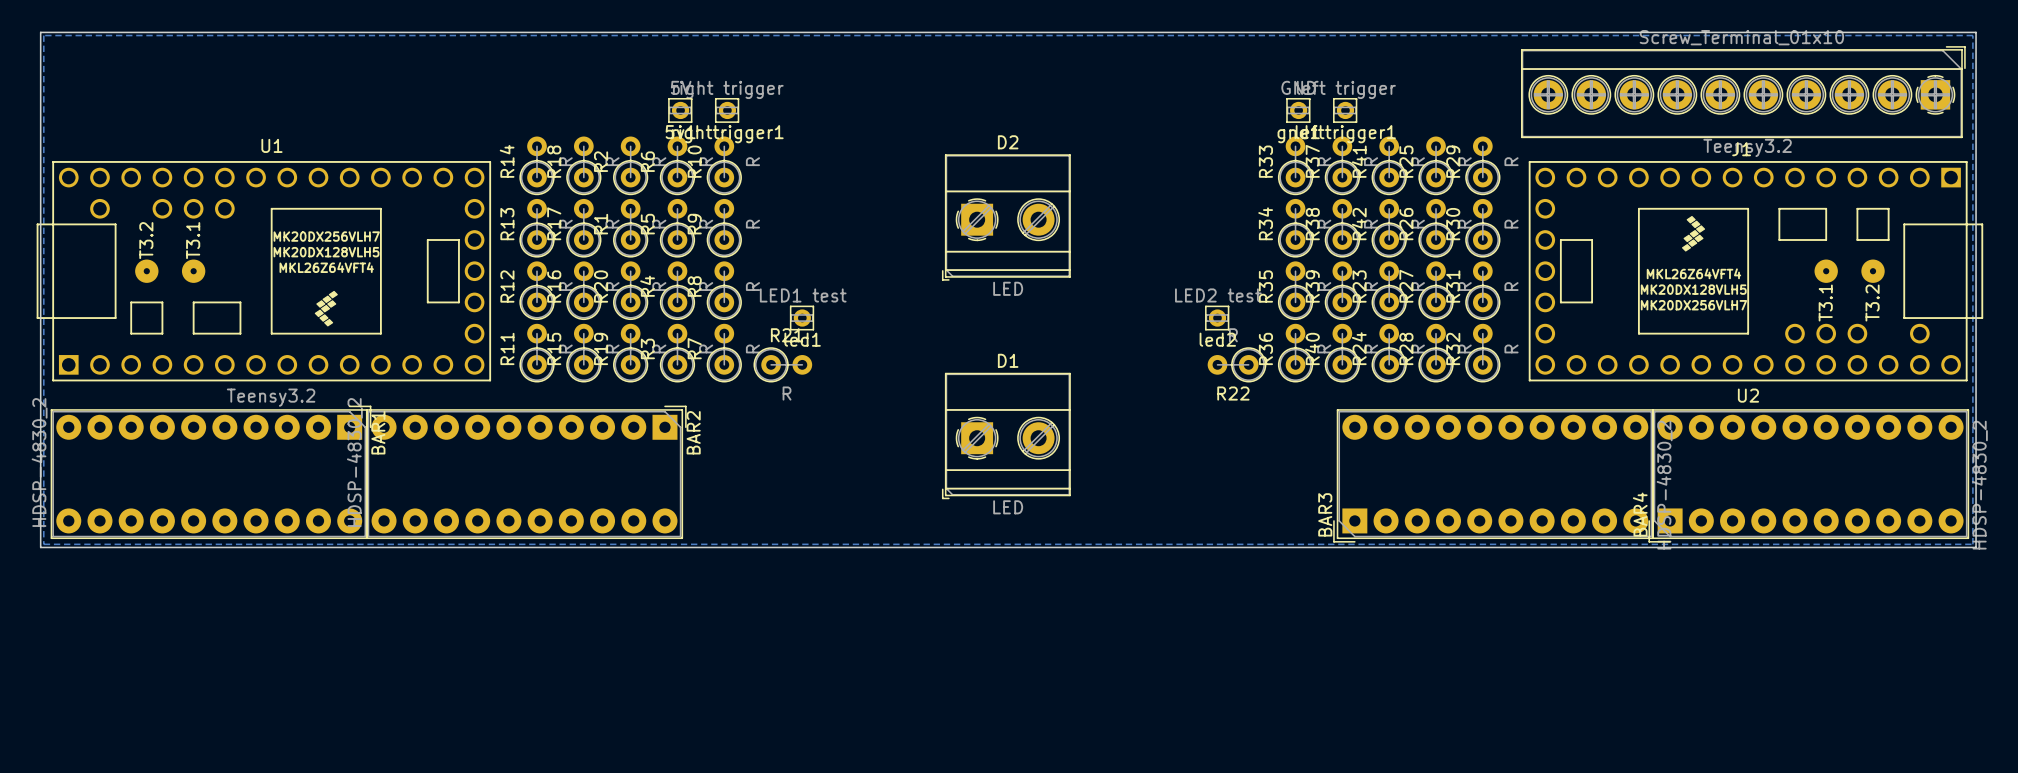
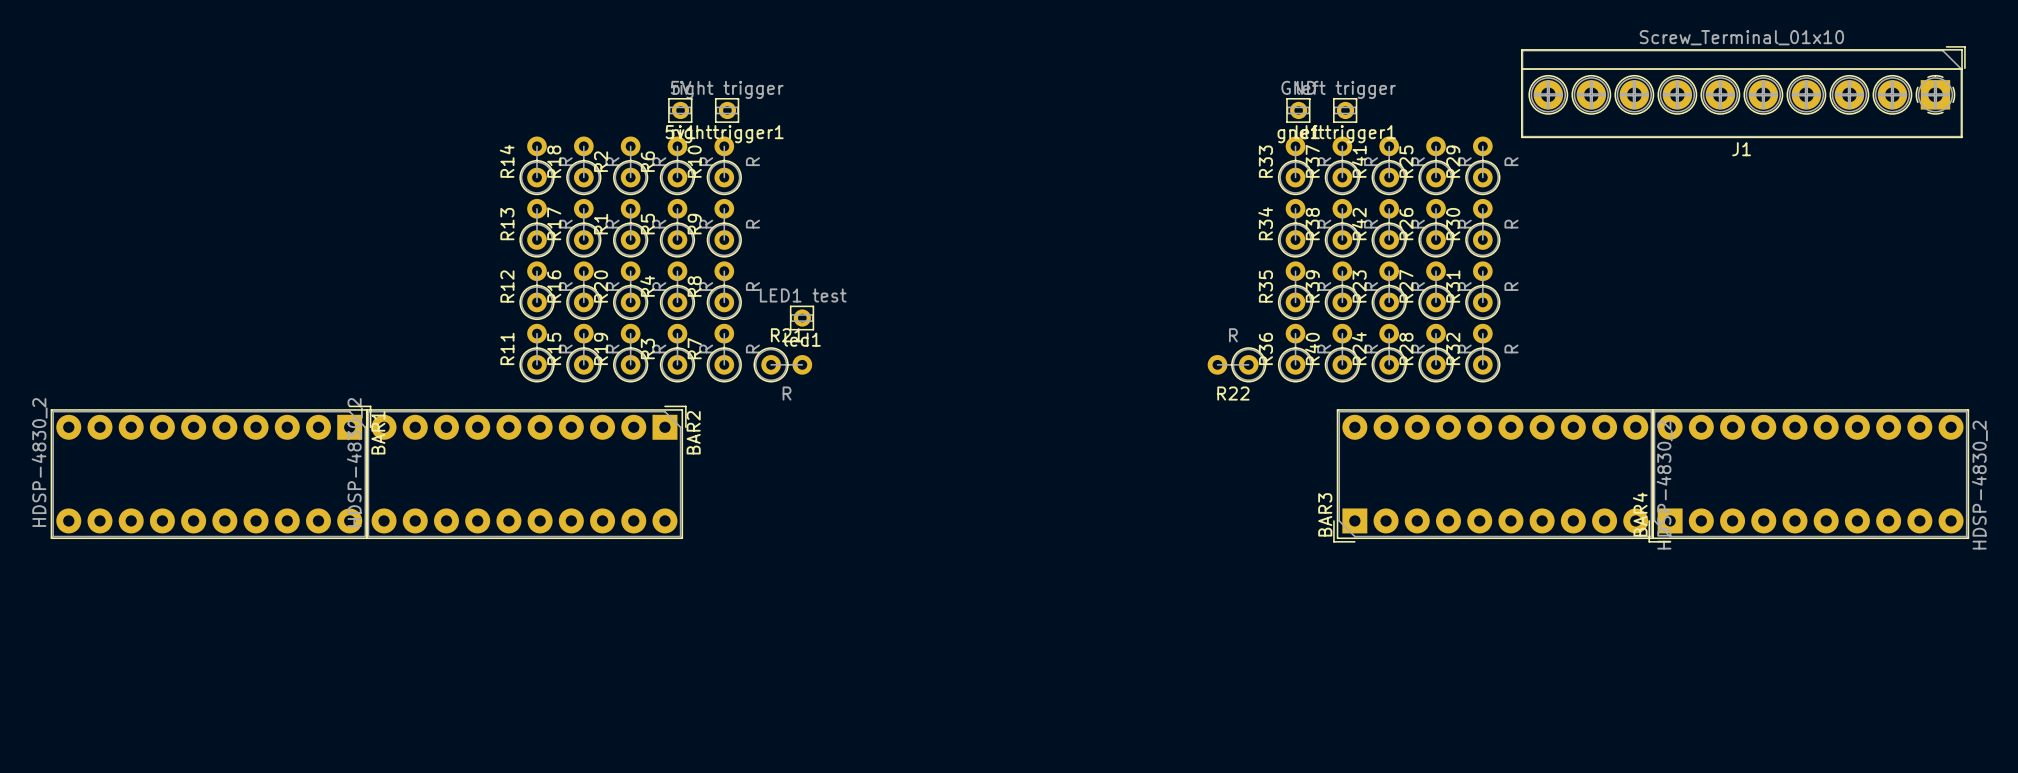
board edge: (40, 32) (40, 547) (1976, 547) (1976, 32) (40, 32) -> none
bottom zone outline: (43, 35) (43, 544) (1972, 544) (1972, 35) (43, 35) -> none
D2: LED (1006, 217) -> none
U1: Teensy3.2 (263, 271) -> none
U2: Teensy3.2 (1755, 271) -> none
led2: LED2 test (1217, 318) -> none
D1: LED (1006, 435) -> none

